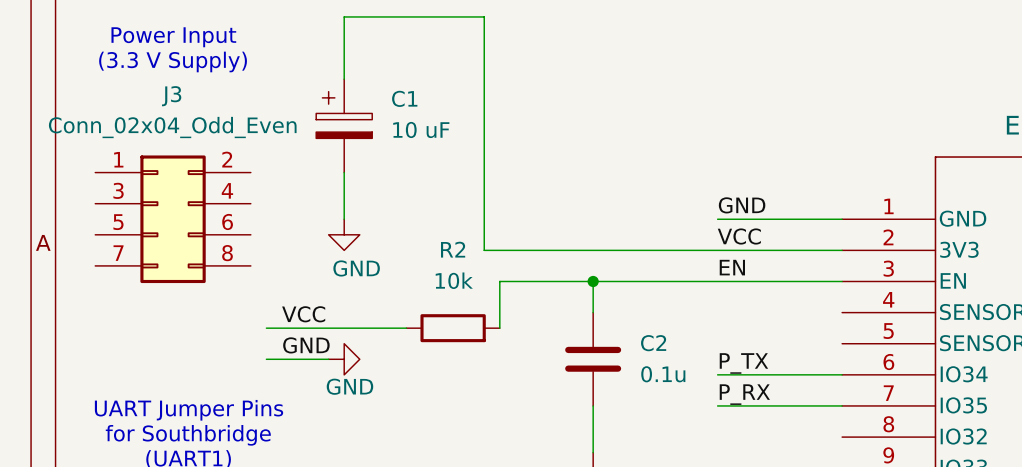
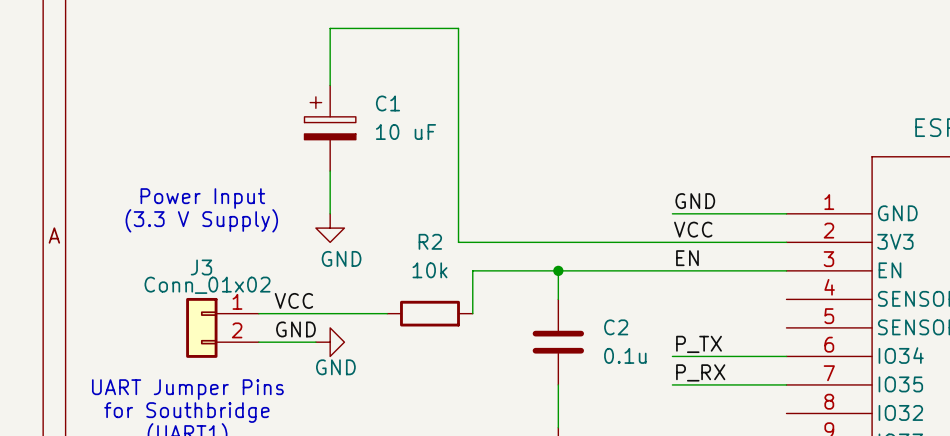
text position: Power Input (173, 37) -> Power Input (202, 198)
text position: (3.3 V Supply) (173, 61) -> (3.3 V Supply) (201, 220)
J3 name position: J3 (171, 96) -> J3 (201, 267)
J3 value: Conn_02x04_Odd_Even (172, 127) -> Conn_01x02 (207, 285)
J3 symbol: [95, 155, 251, 284] -> [186, 297, 259, 358]

